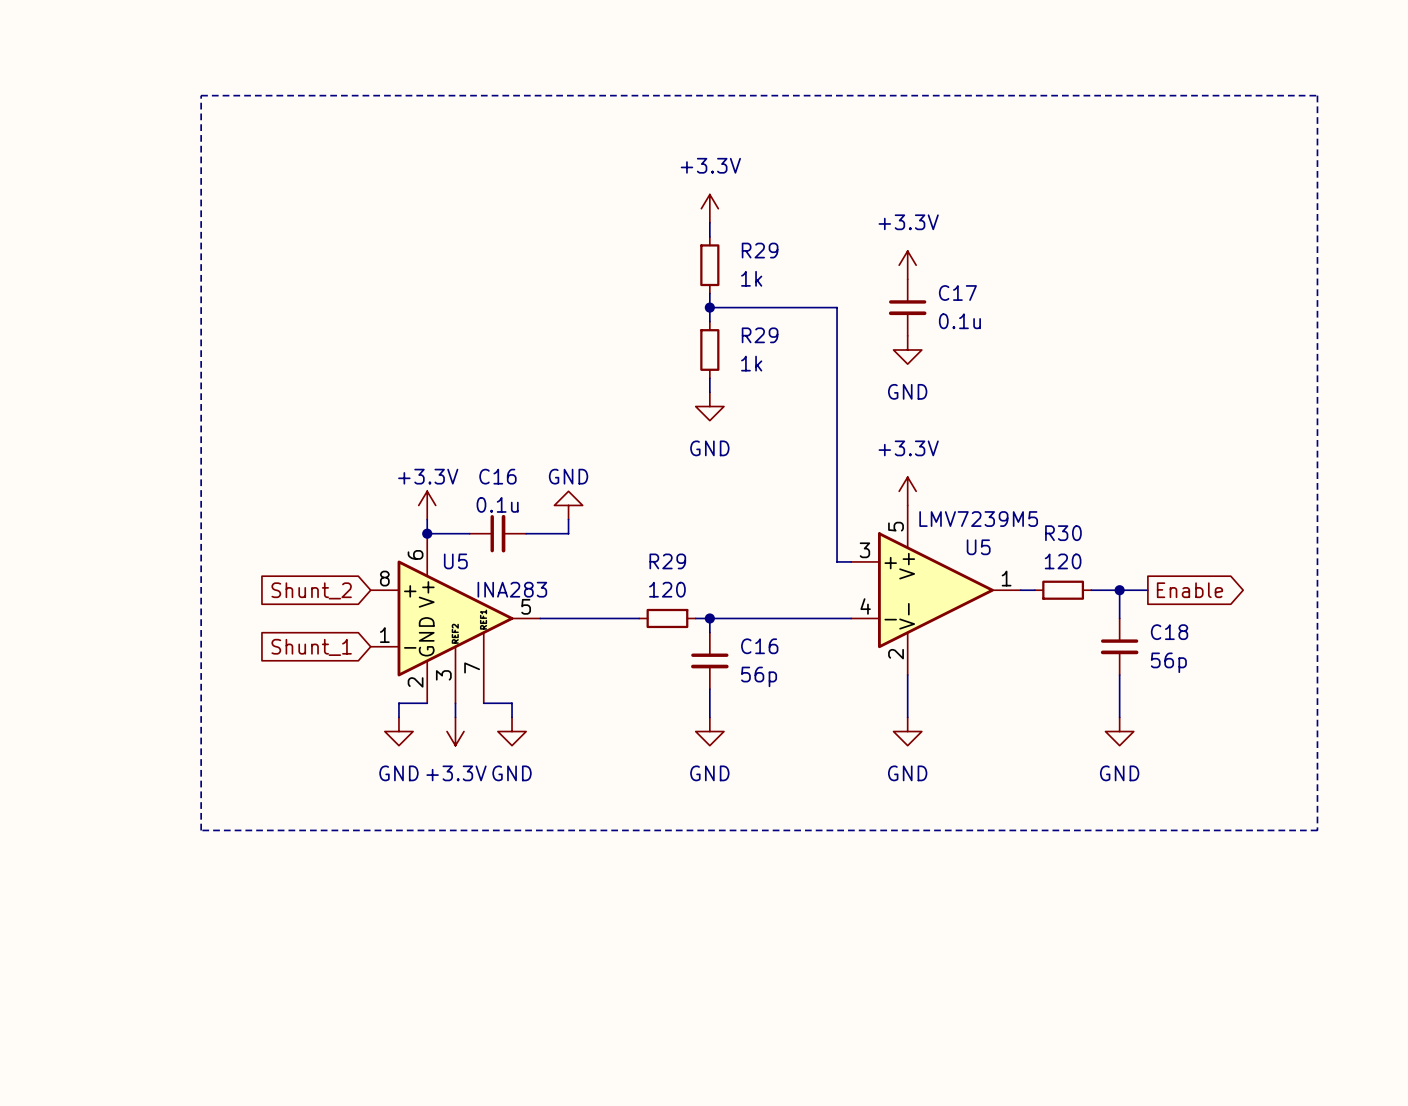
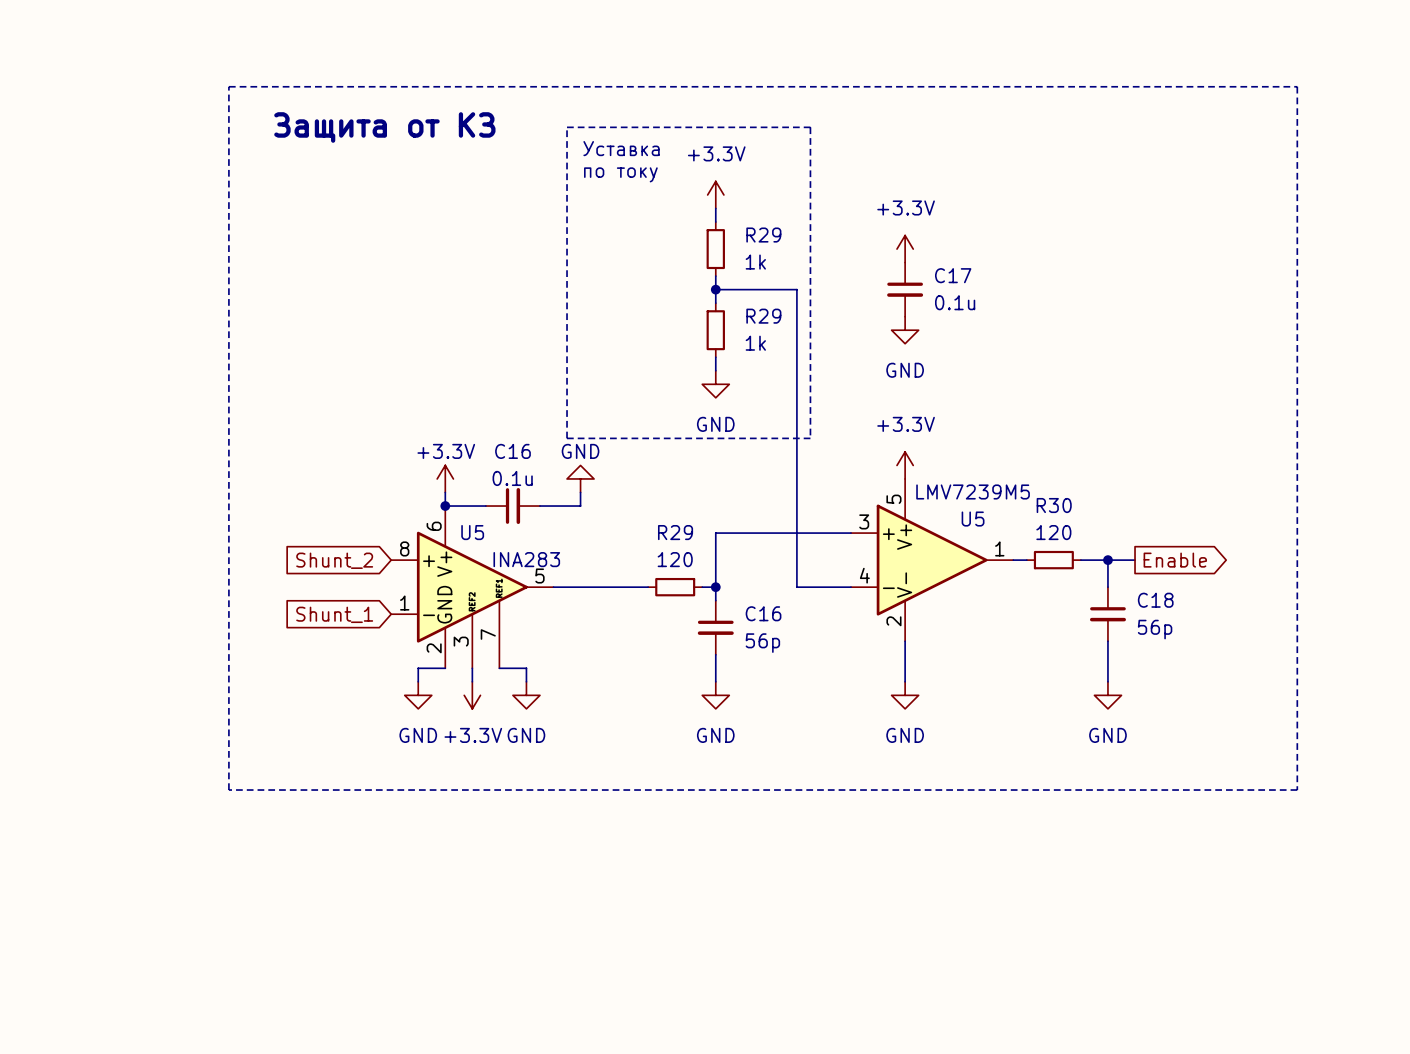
text: none -> Защита от КЗ (384, 127)
line: none -> (567, 127) (810, 127) (810, 438) (567, 438) (567, 127)
text: none -> Уставка (621, 148)
text: none -> по току (620, 174)
wire: (794, 307) (837, 307) (837, 561) -> (796, 289) (796, 587)
wire: (709, 618) (794, 618) -> (715, 587) (715, 533) (837, 533)

